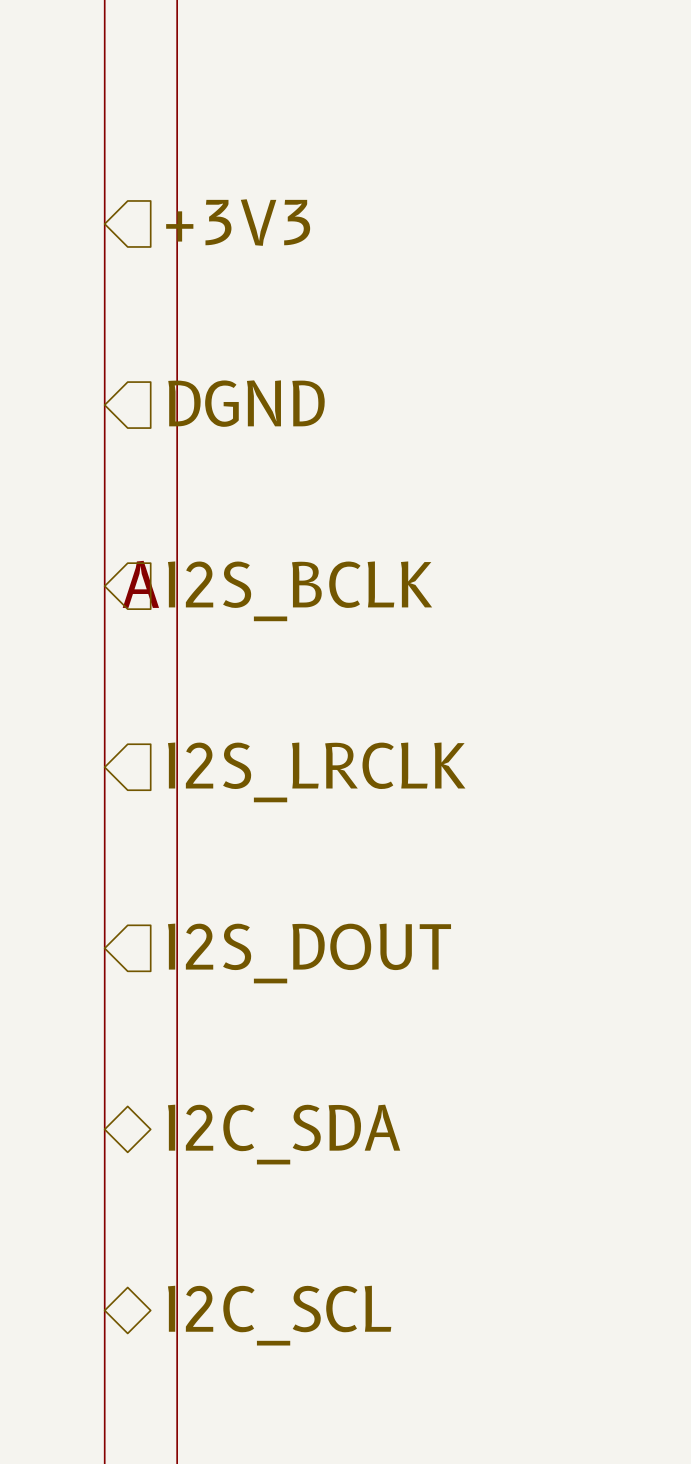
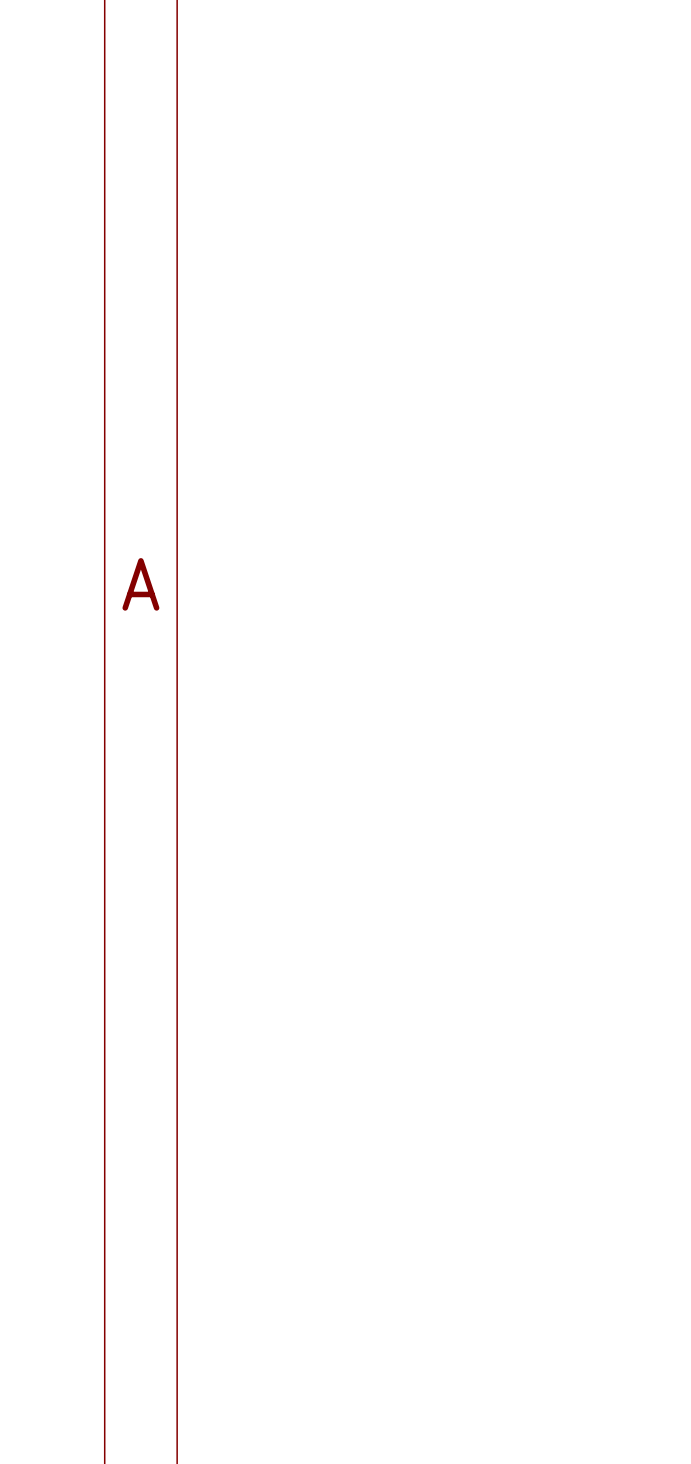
hierarchical label: +3V3 (238, 222) -> none
hierarchical label: DGND (246, 403) -> none
hierarchical label: I2S_BCLK (300, 591) -> none
hierarchical label: I2S_LRCLK (316, 772) -> none
hierarchical label: I2S_DOUT (309, 953) -> none
hierarchical label: I2C_SDA (284, 1134) -> none
hierarchical label: I2C_SCL (279, 1315) -> none

